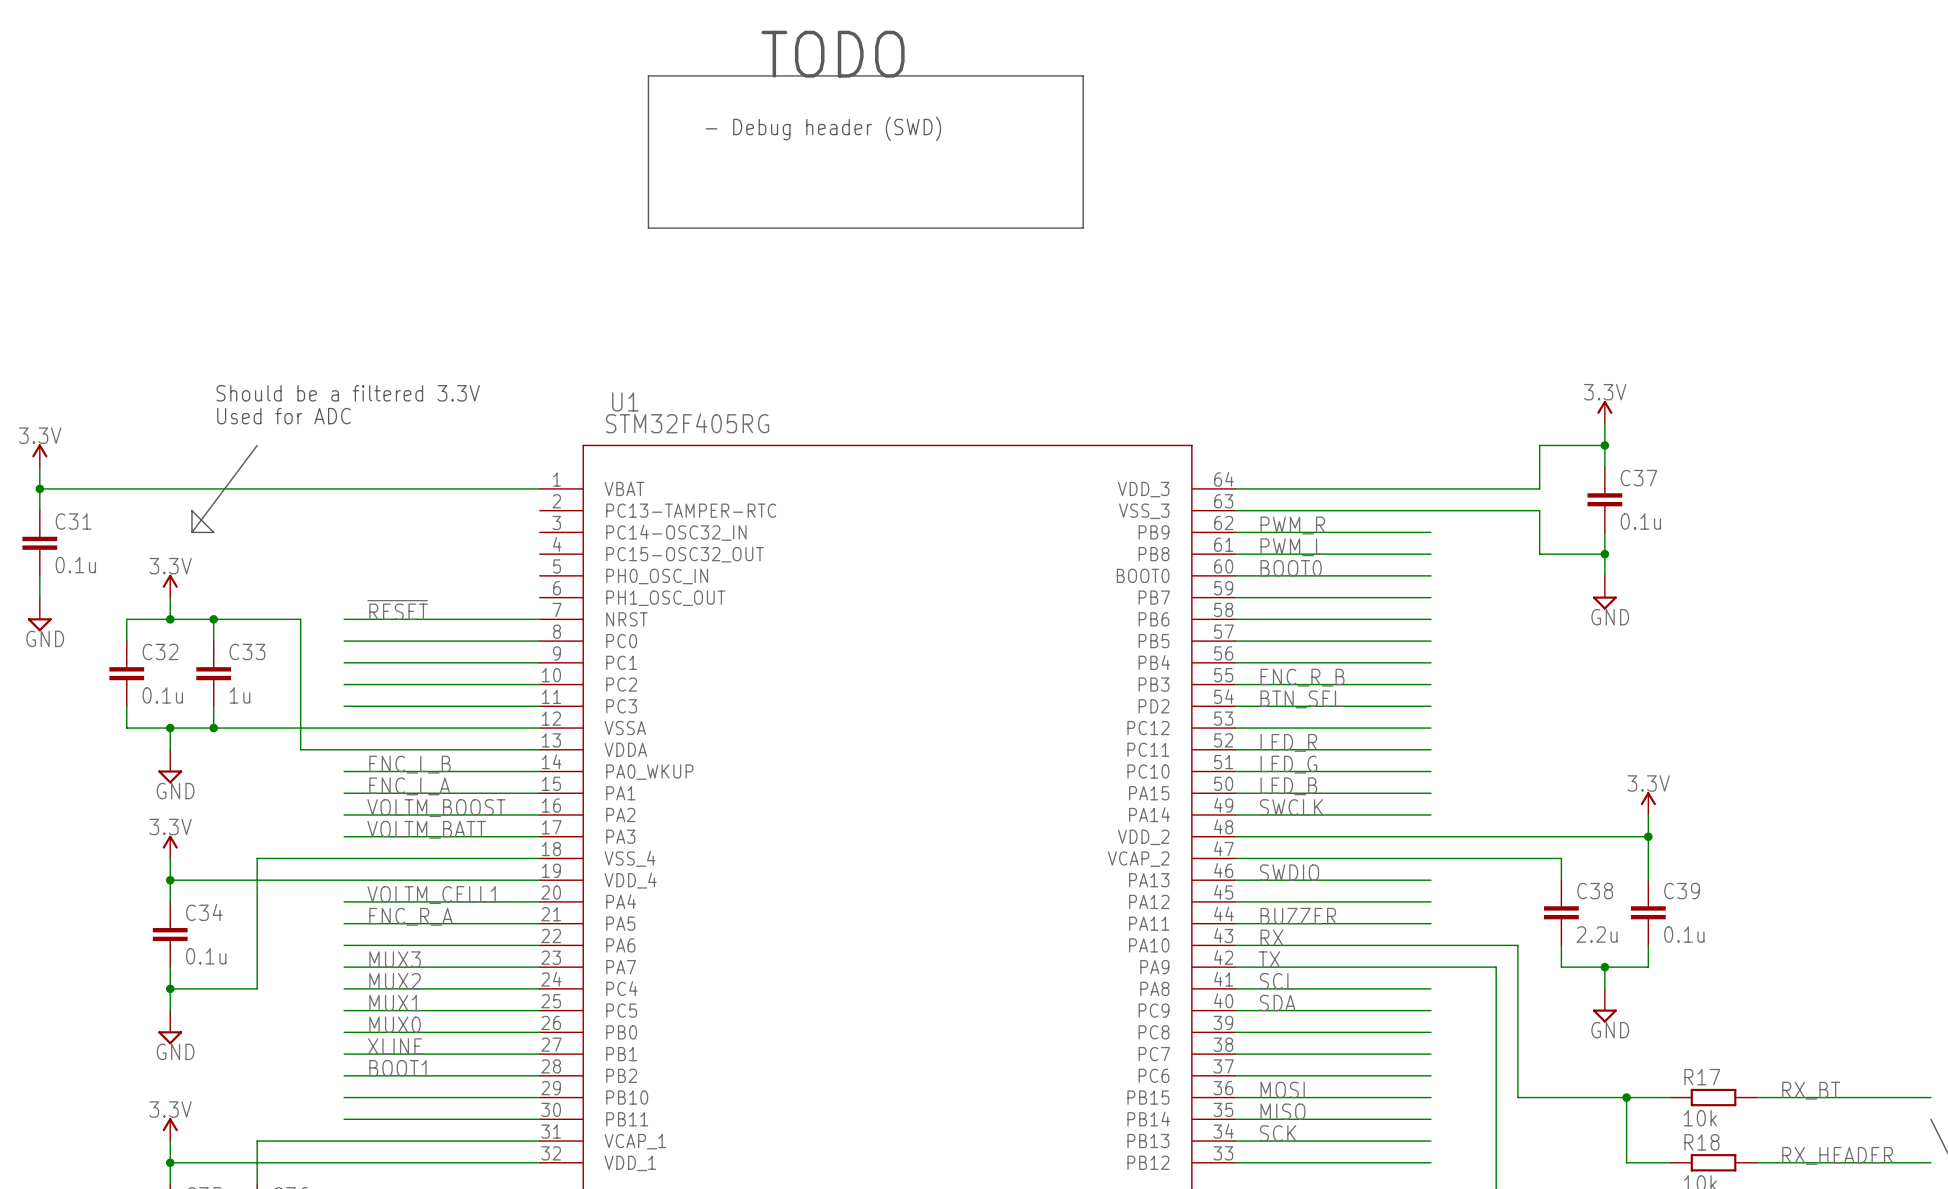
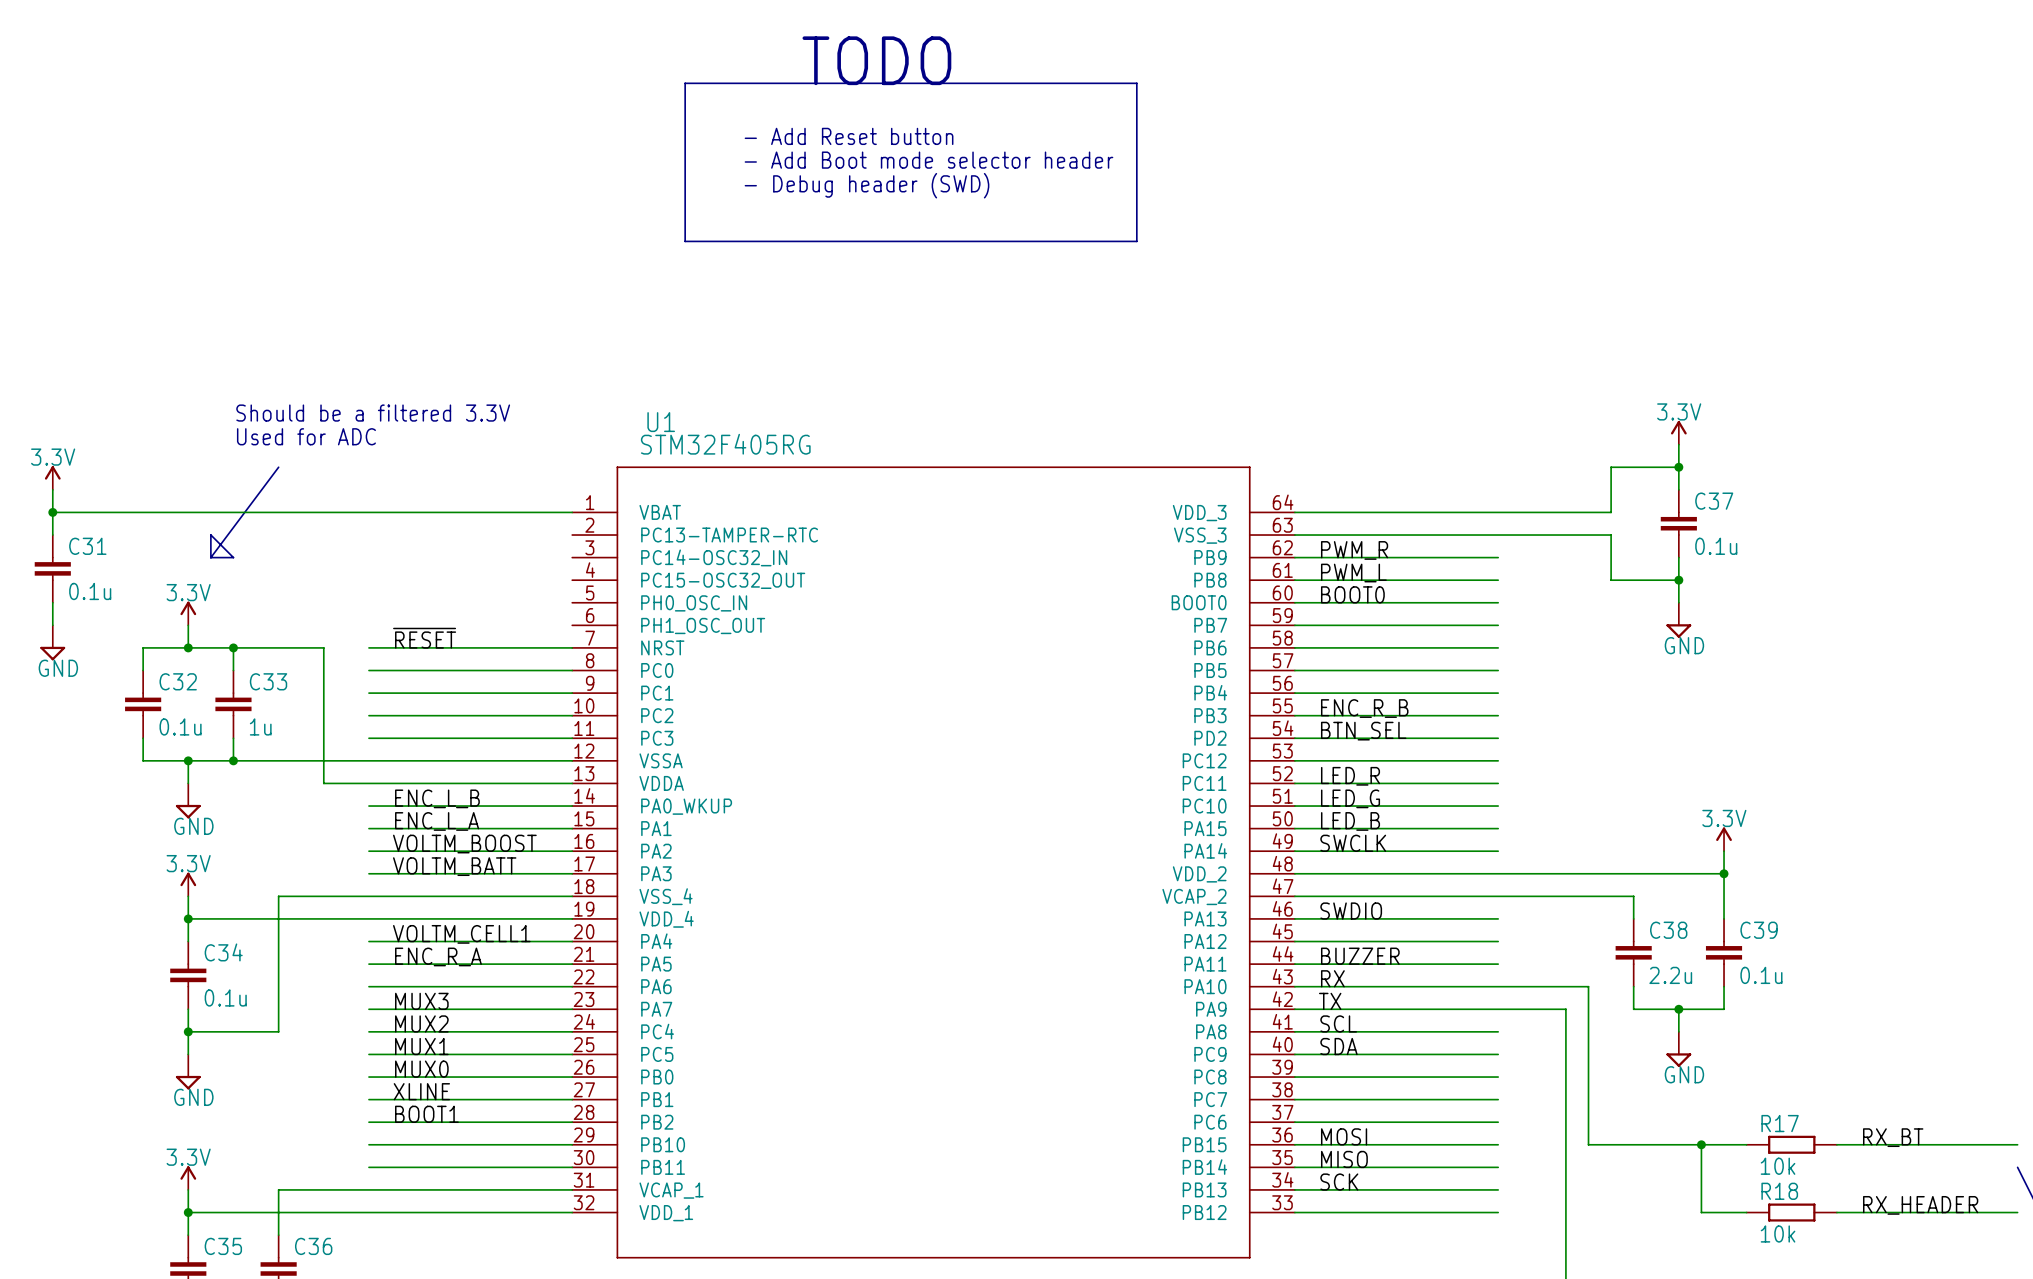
text: - Debug header (SWD) (823, 128) -> - Add Reset button (849, 136)
text: none -> - Add Boot mode selector header (928, 160)
text: none -> - Debug header (SWD) (866, 185)

